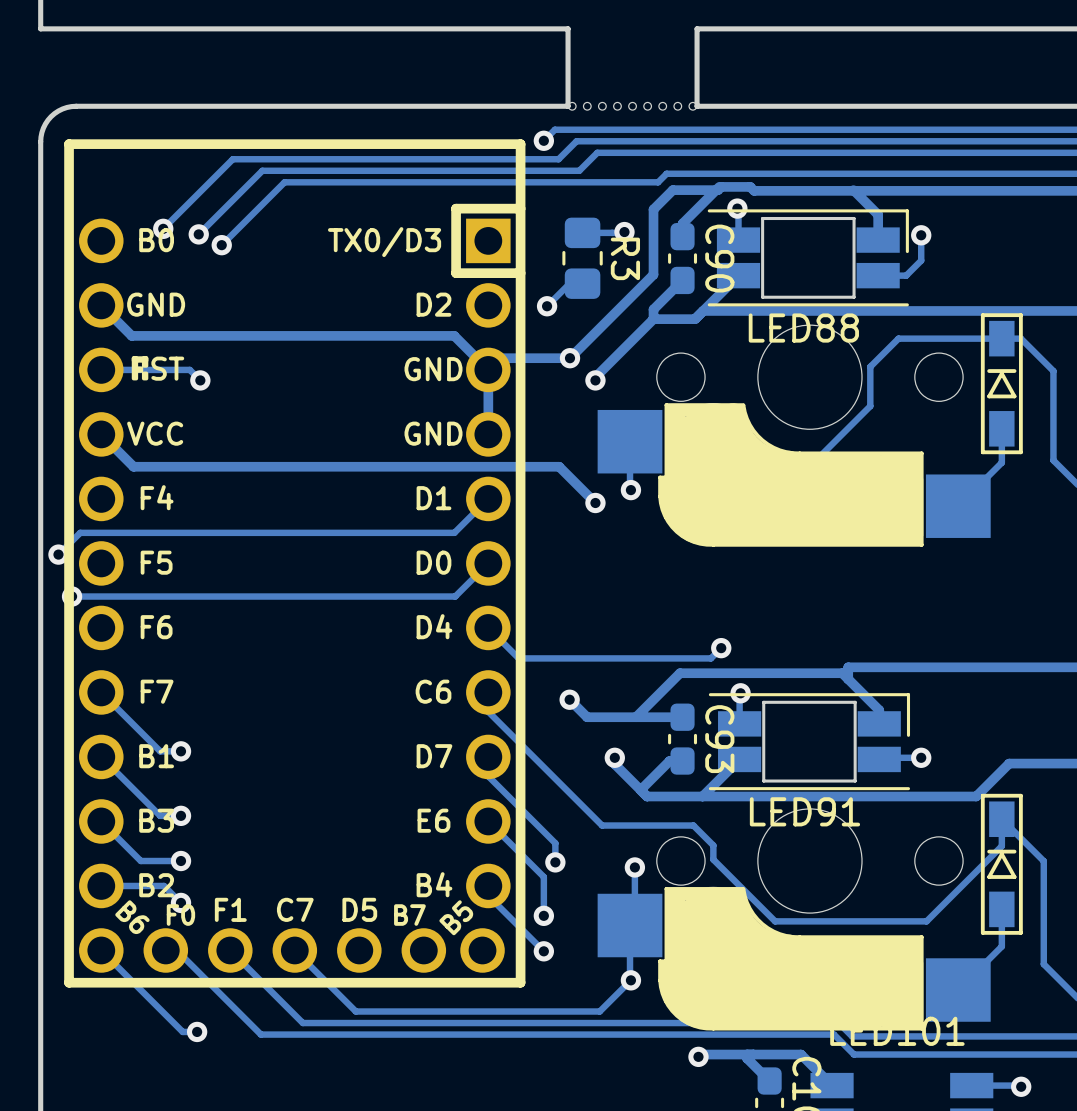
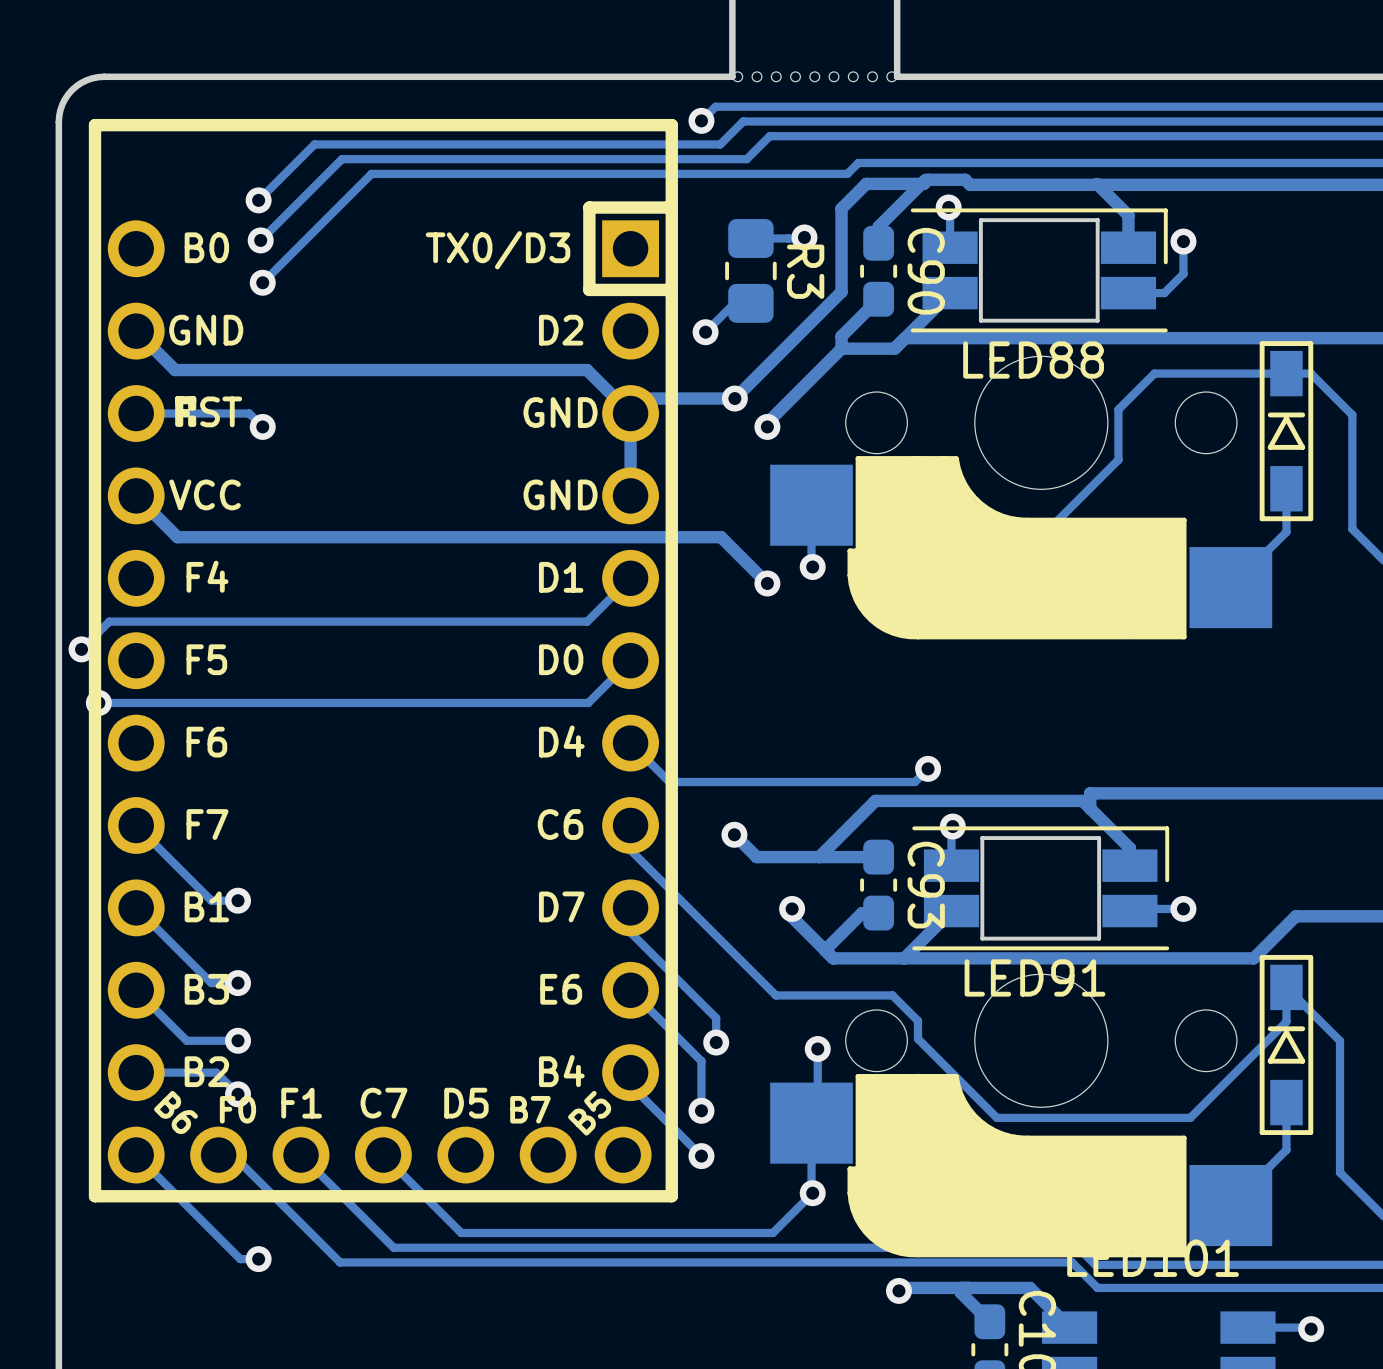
track: (240, 159) (232, 159) (163, 228) -> (314, 144) (258, 200)
track: (285, 182) (221, 245) -> (371, 173) (262, 282)
via: none -> (258, 200)
via: (163, 228) -> none
via: (221, 245) -> none
via: none -> (262, 282)

